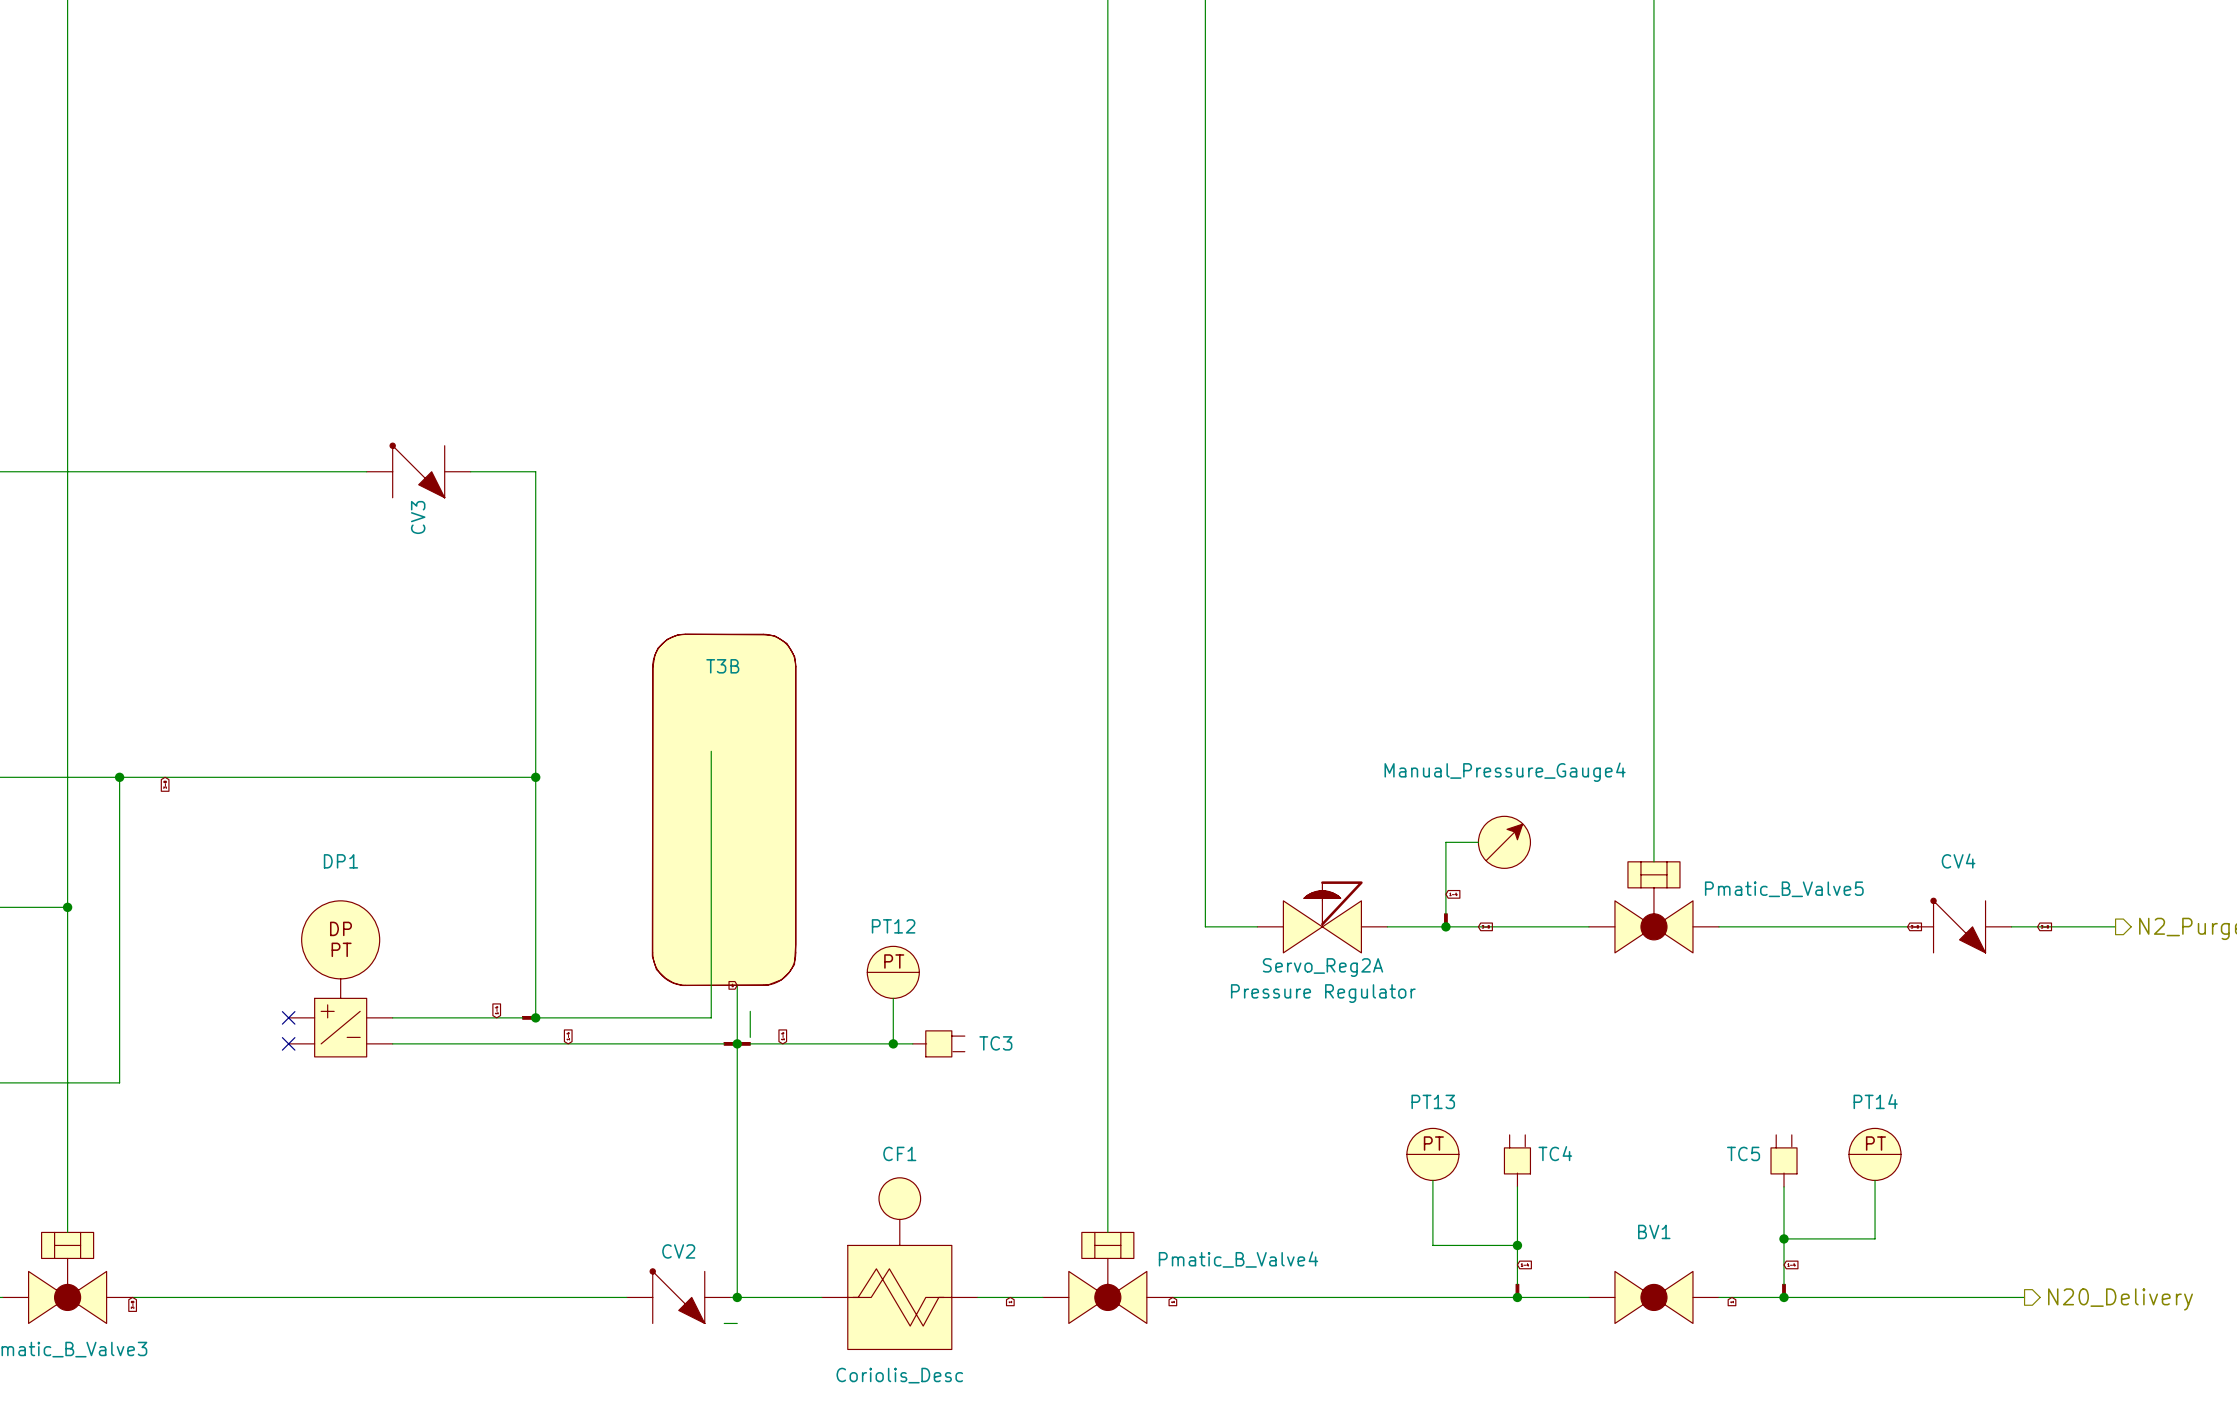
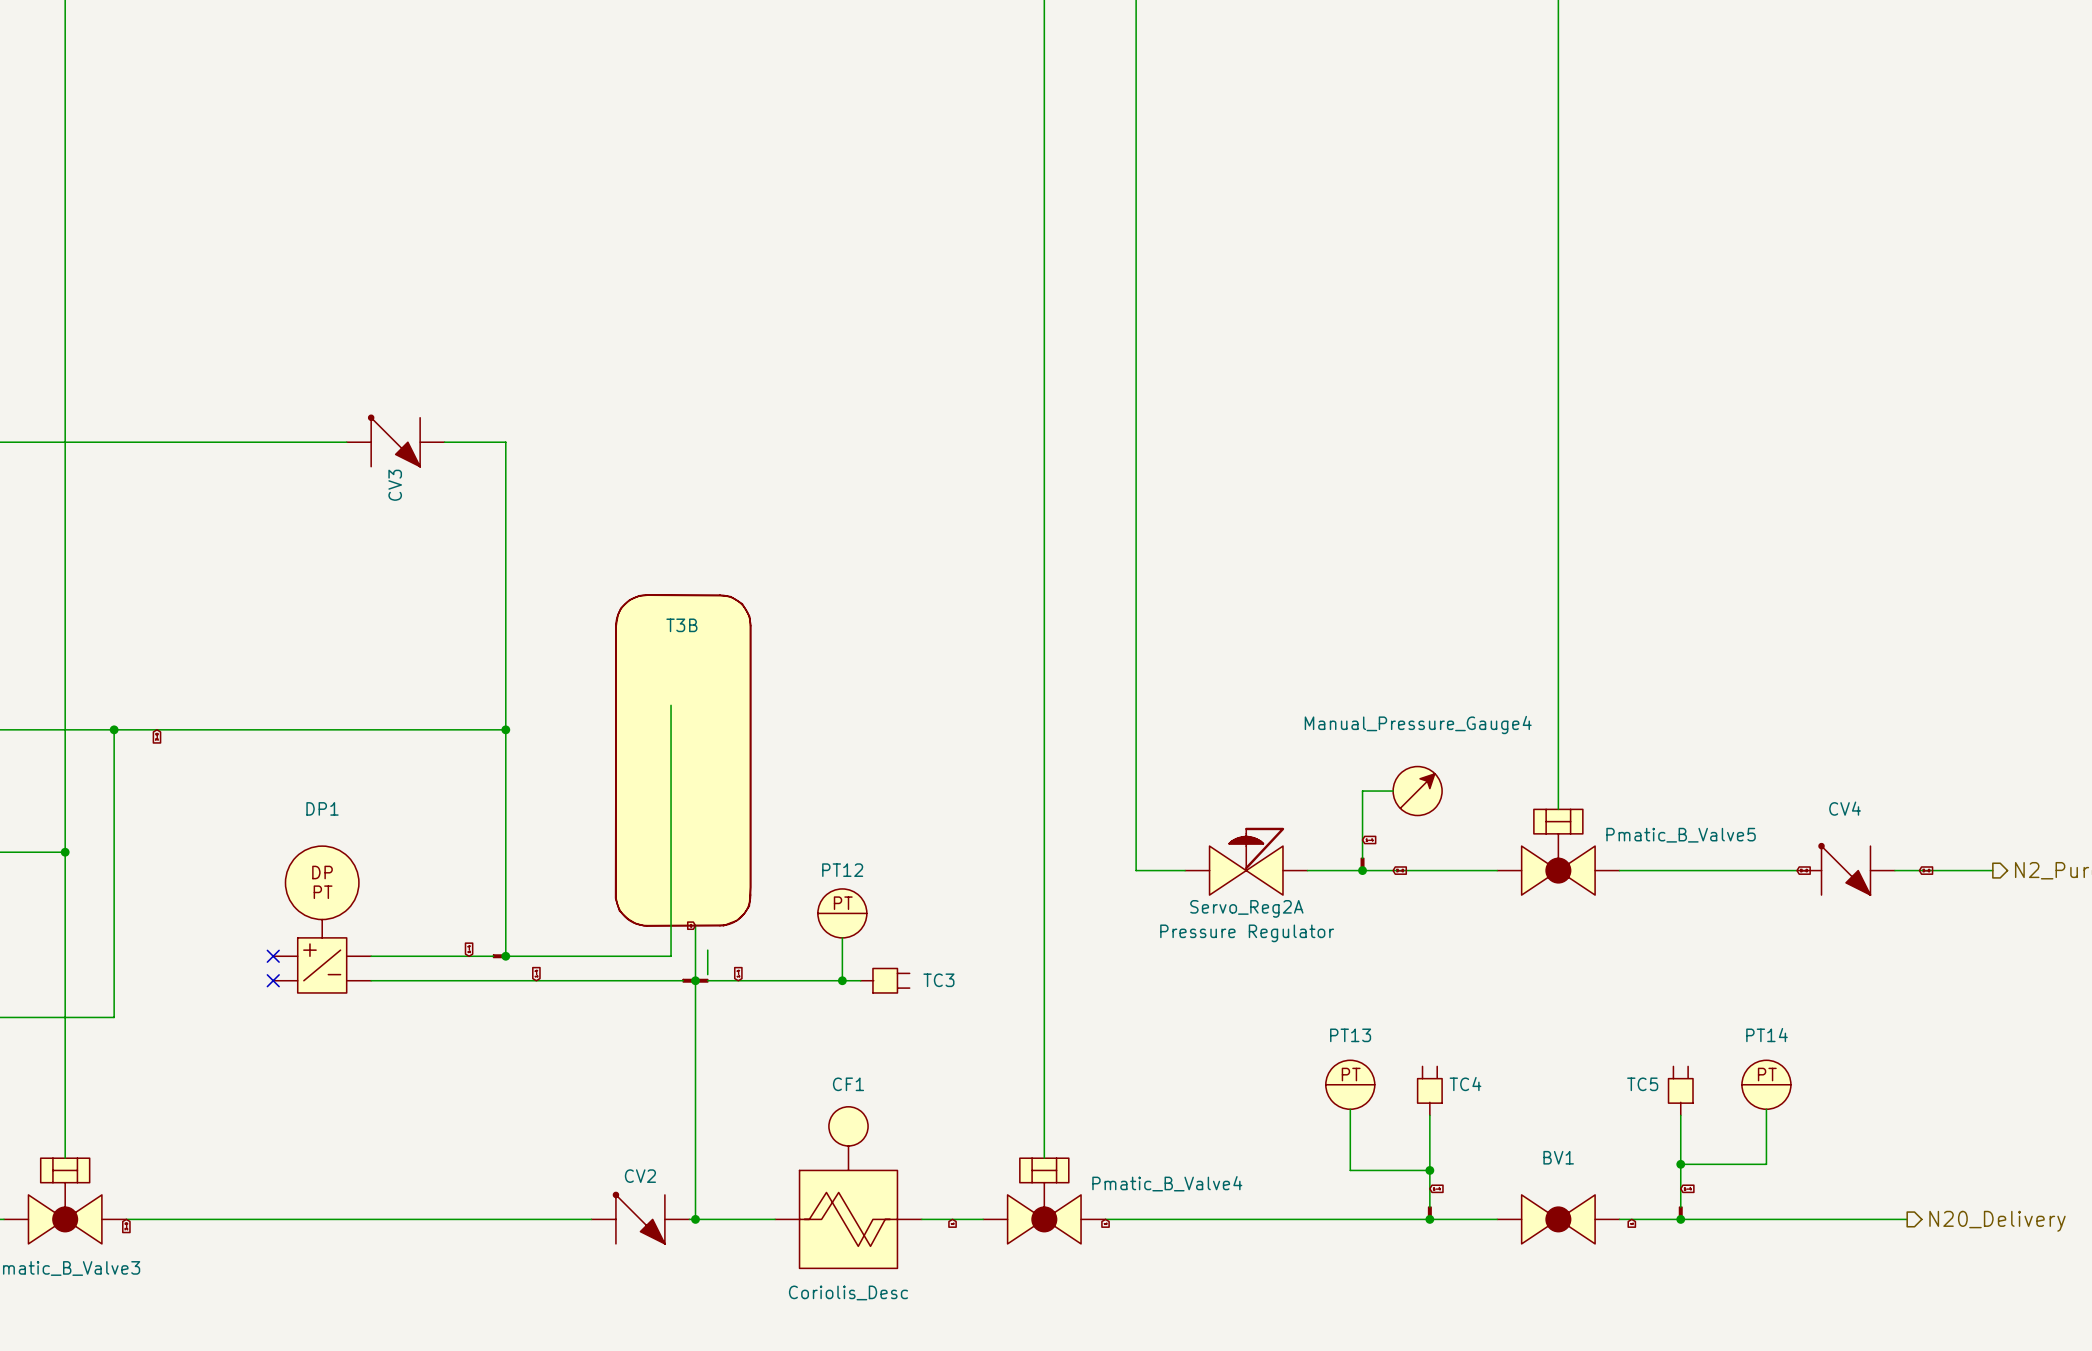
wire: (724, 1323) (737, 1323) -> none

